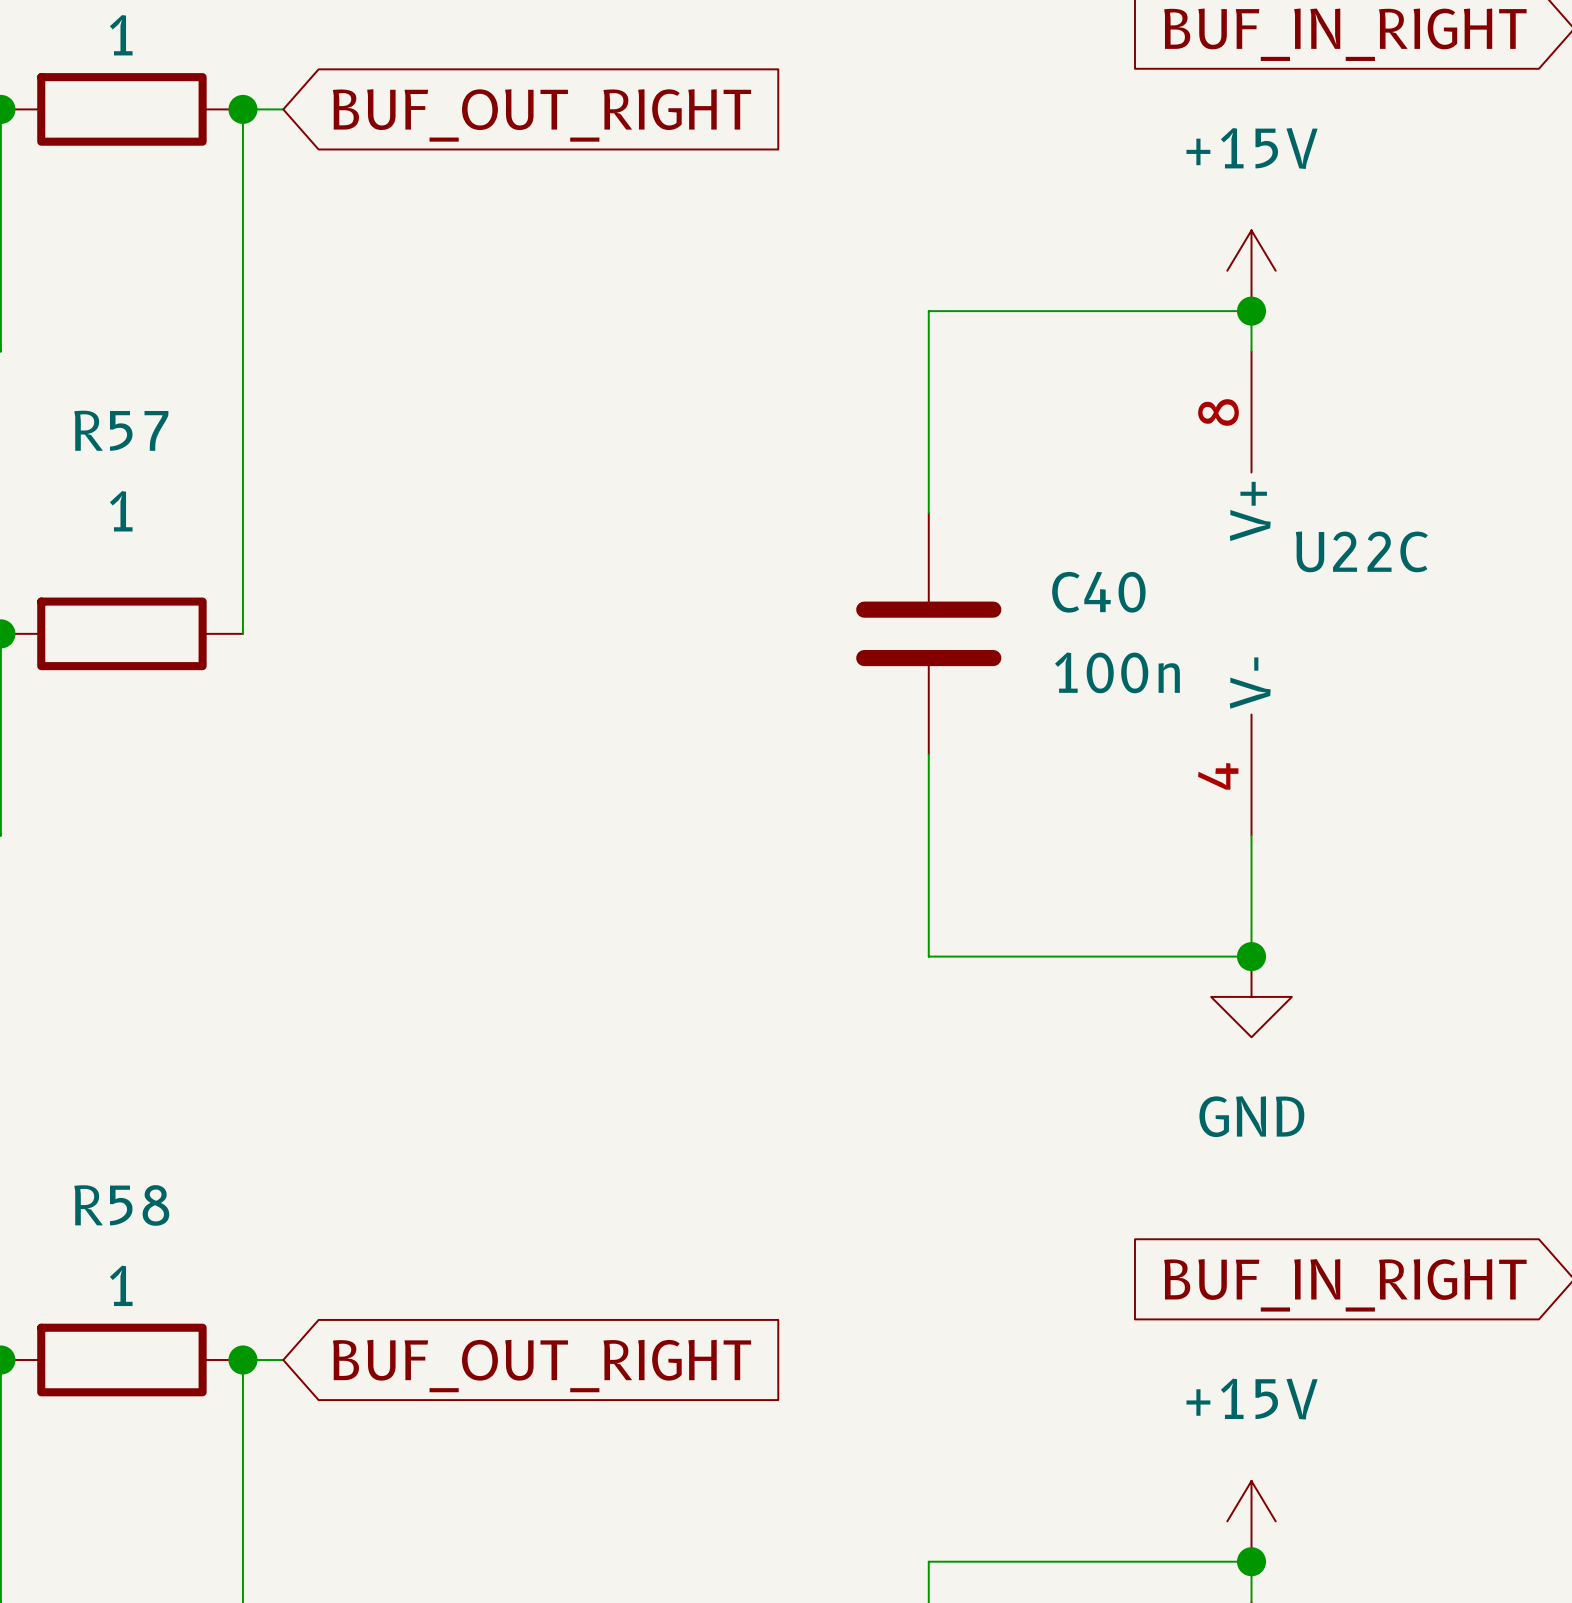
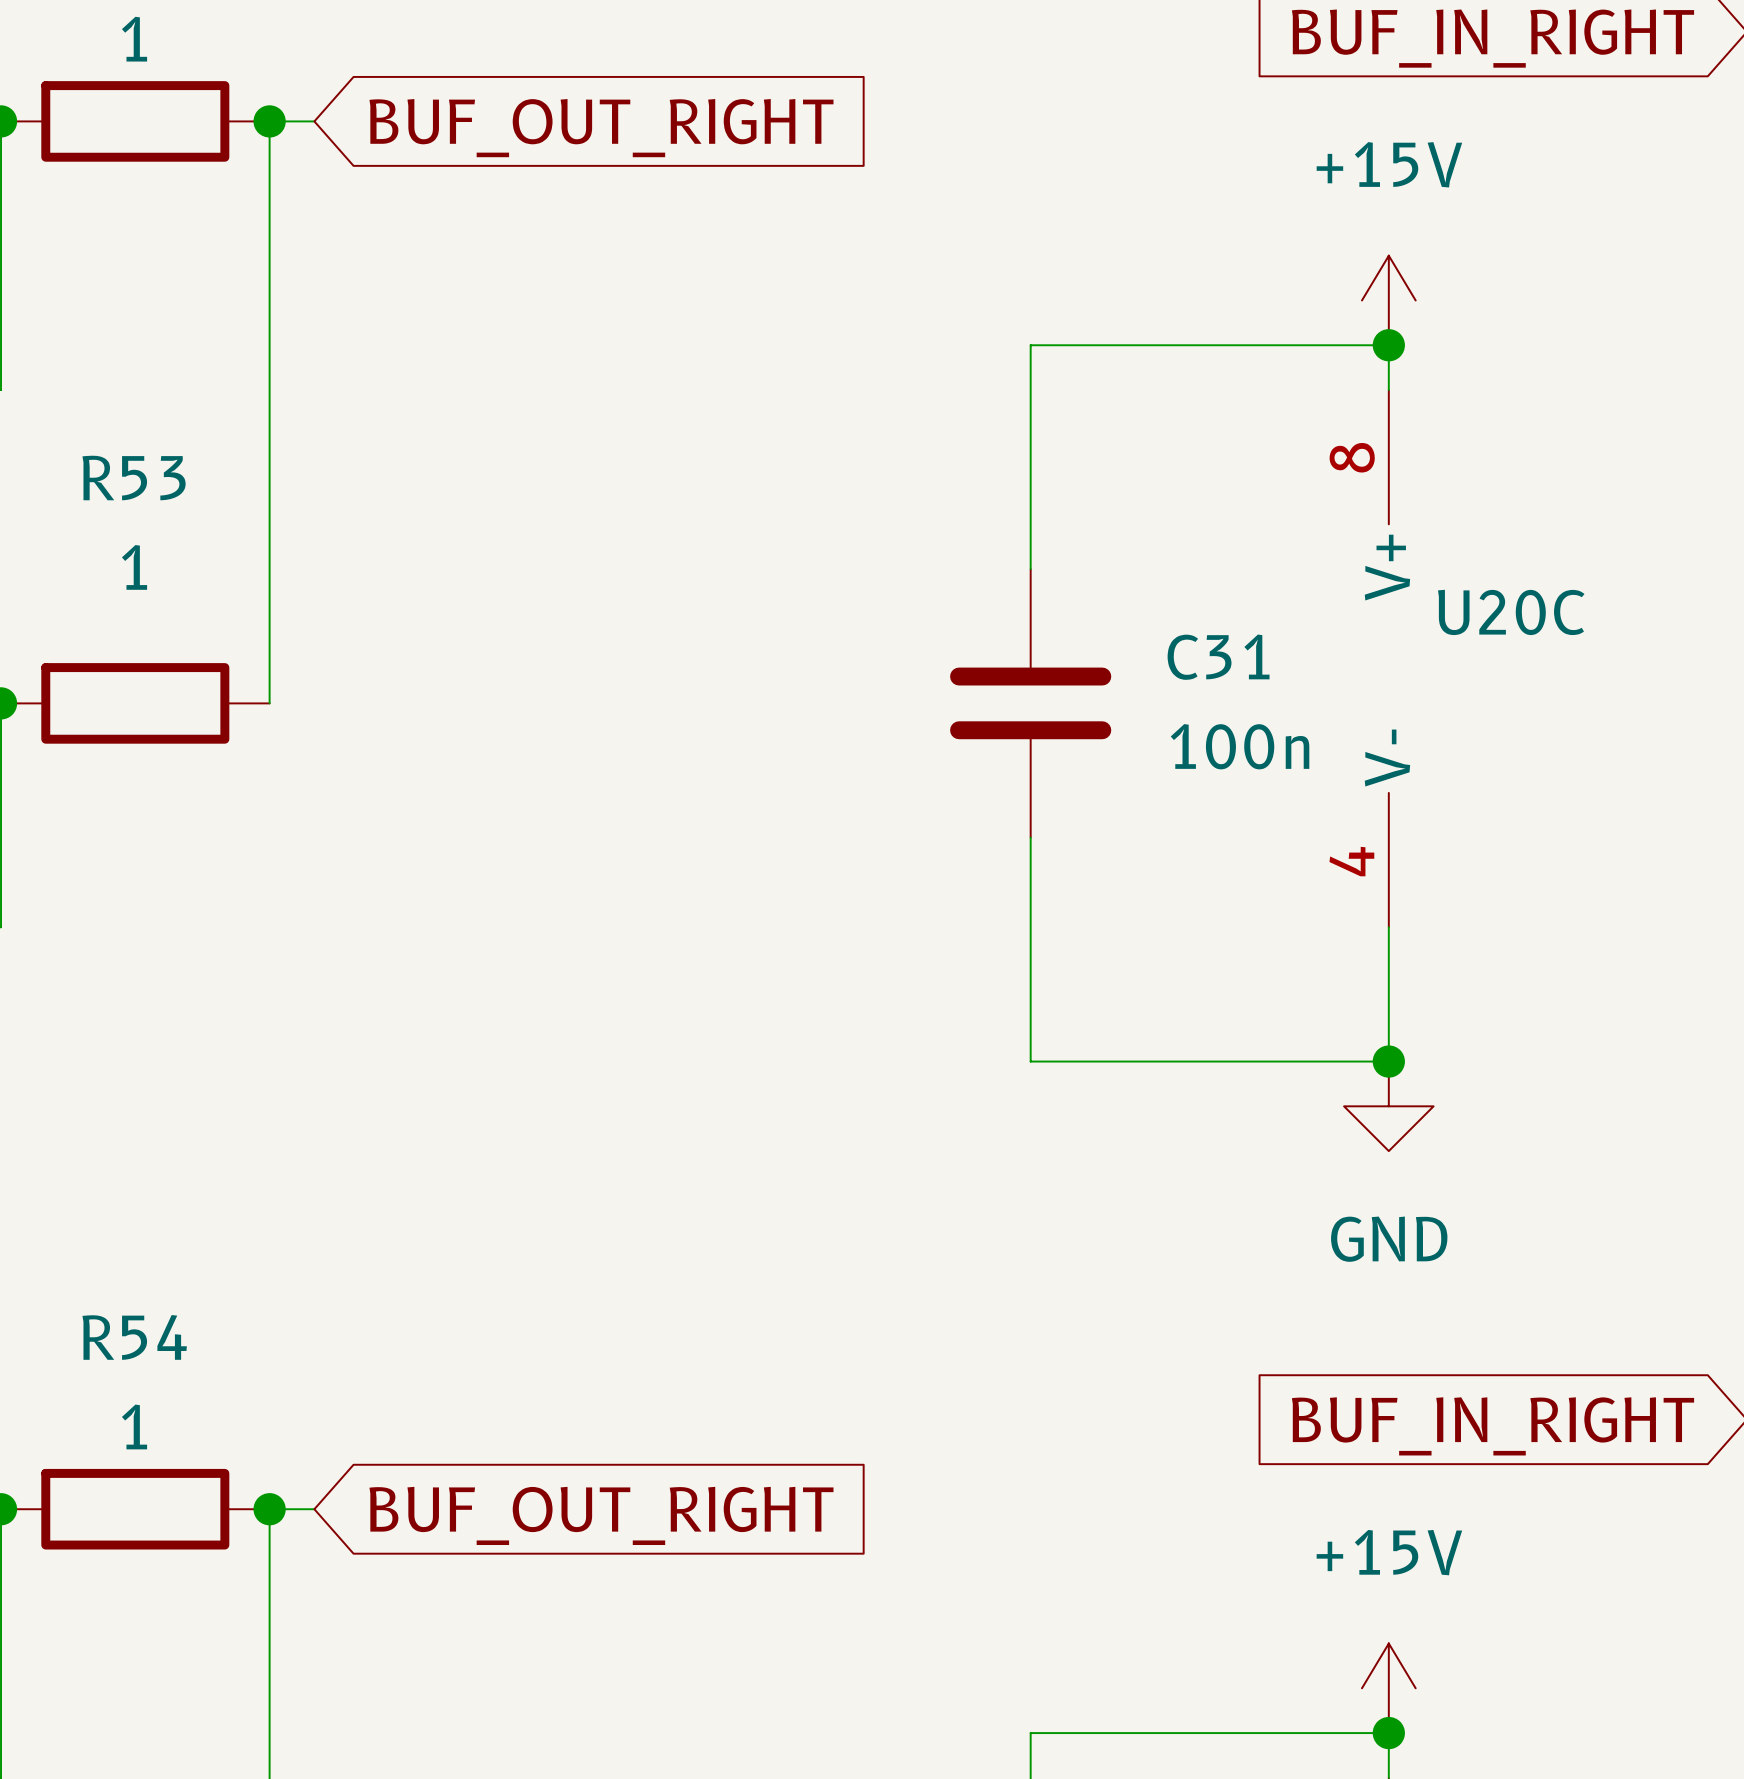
R57 name: R57 (121, 430) -> R53 (134, 478)
U22C name: U22C (1361, 551) -> U20C (1511, 612)
C40 name: C40 (1098, 592) -> C31 (1218, 657)
R58 name: R58 (121, 1205) -> R54 (134, 1337)

